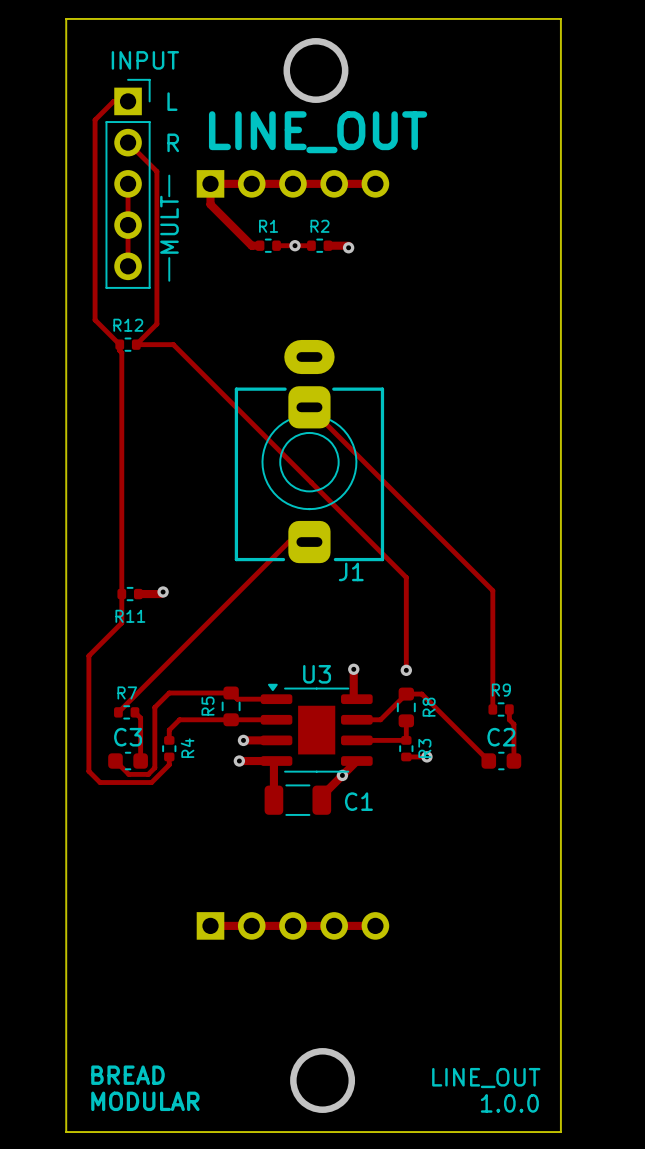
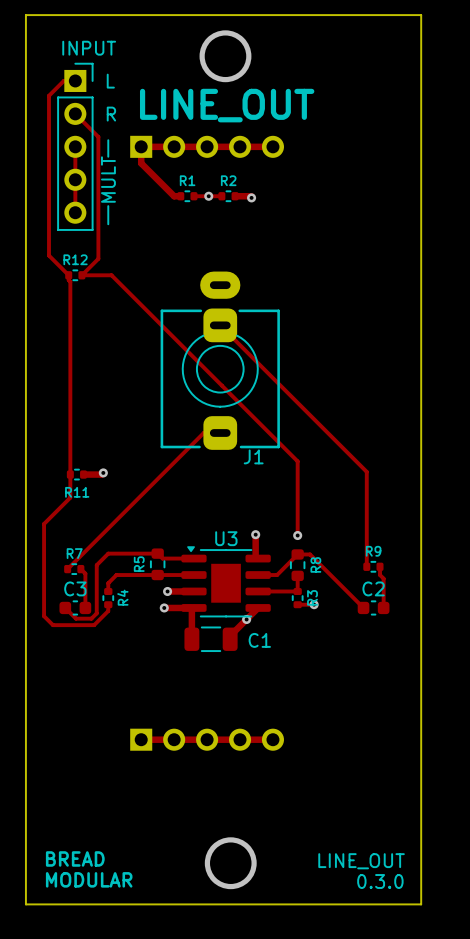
text: 1.0.0 (509, 1103) -> 0.3.0 (380, 881)

